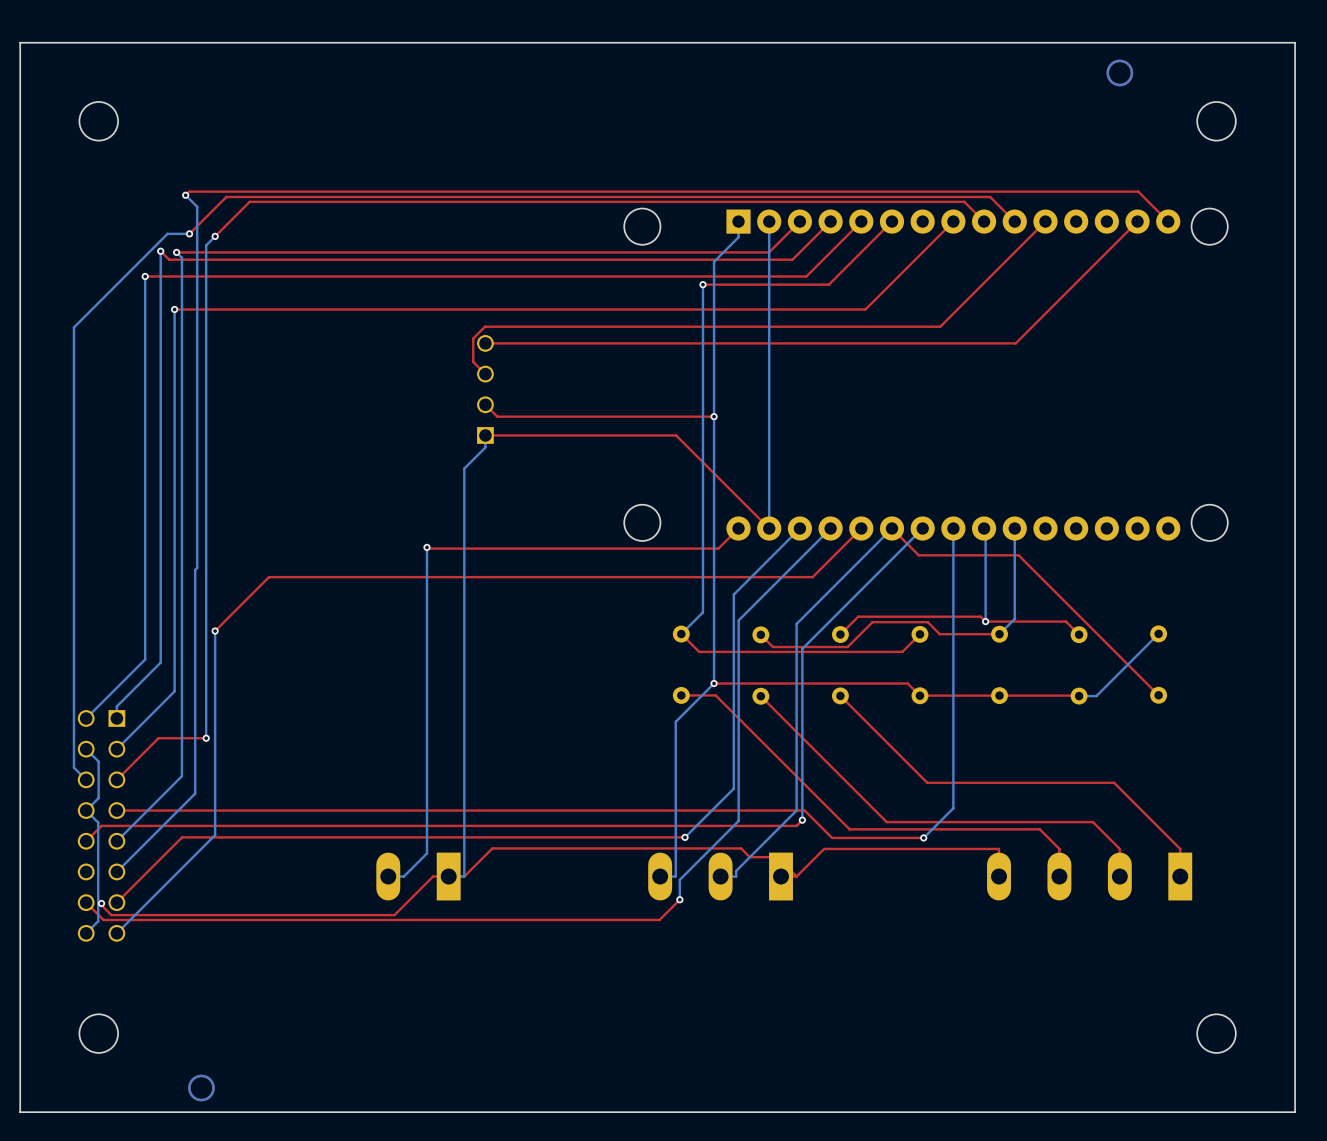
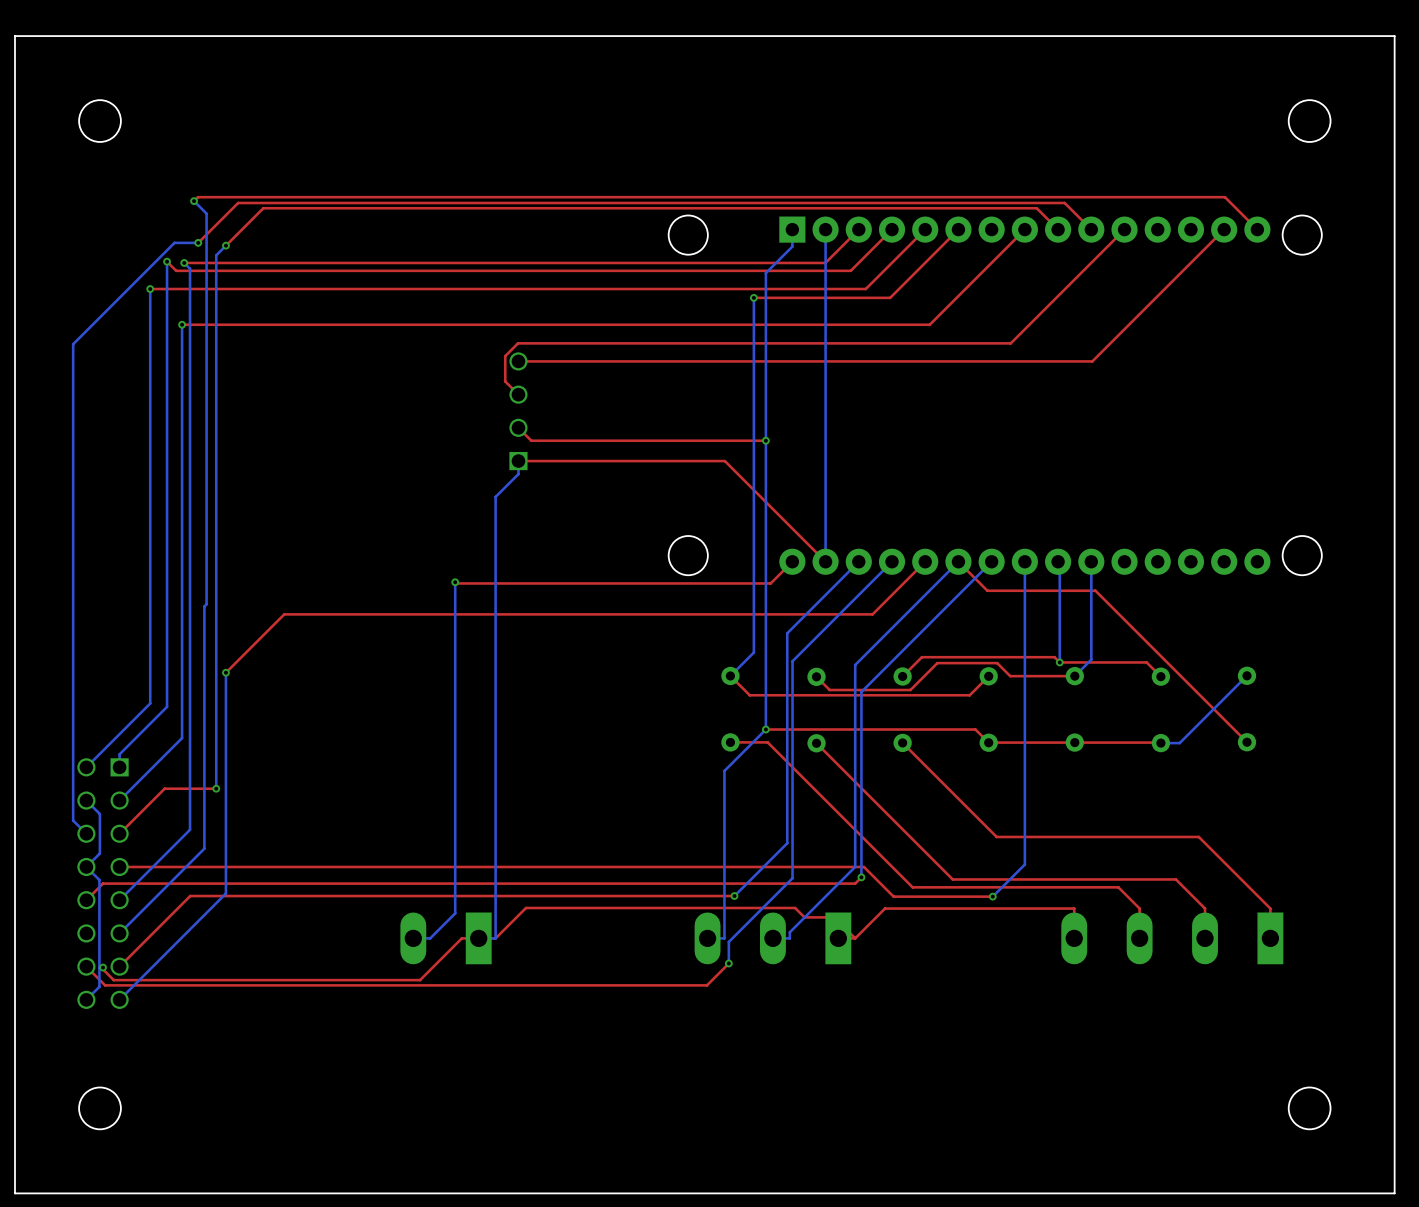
drawing: [1106, 59, 1134, 87] -> none
drawing: [188, 1074, 215, 1102] -> none

